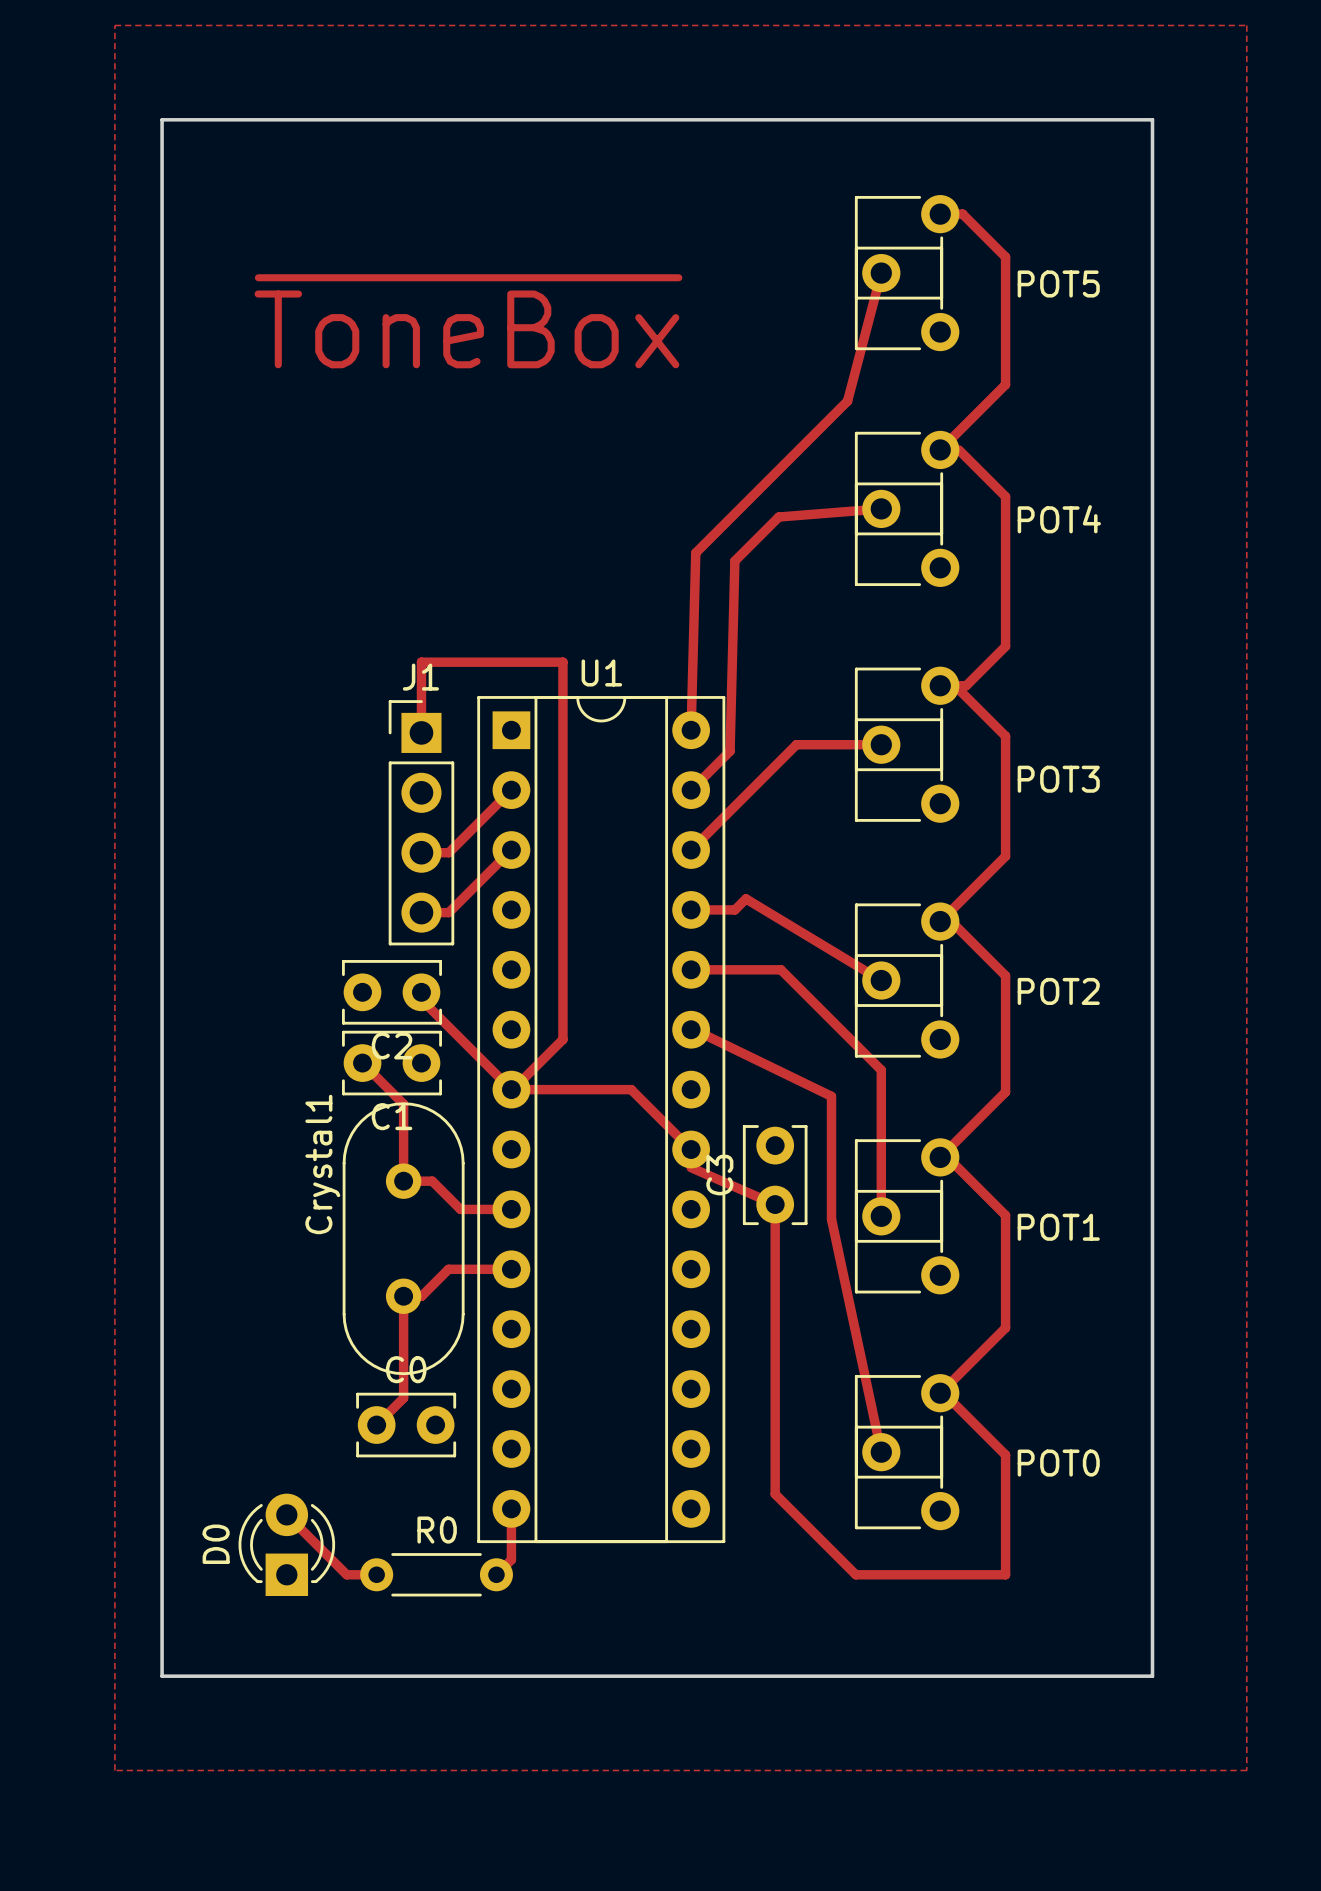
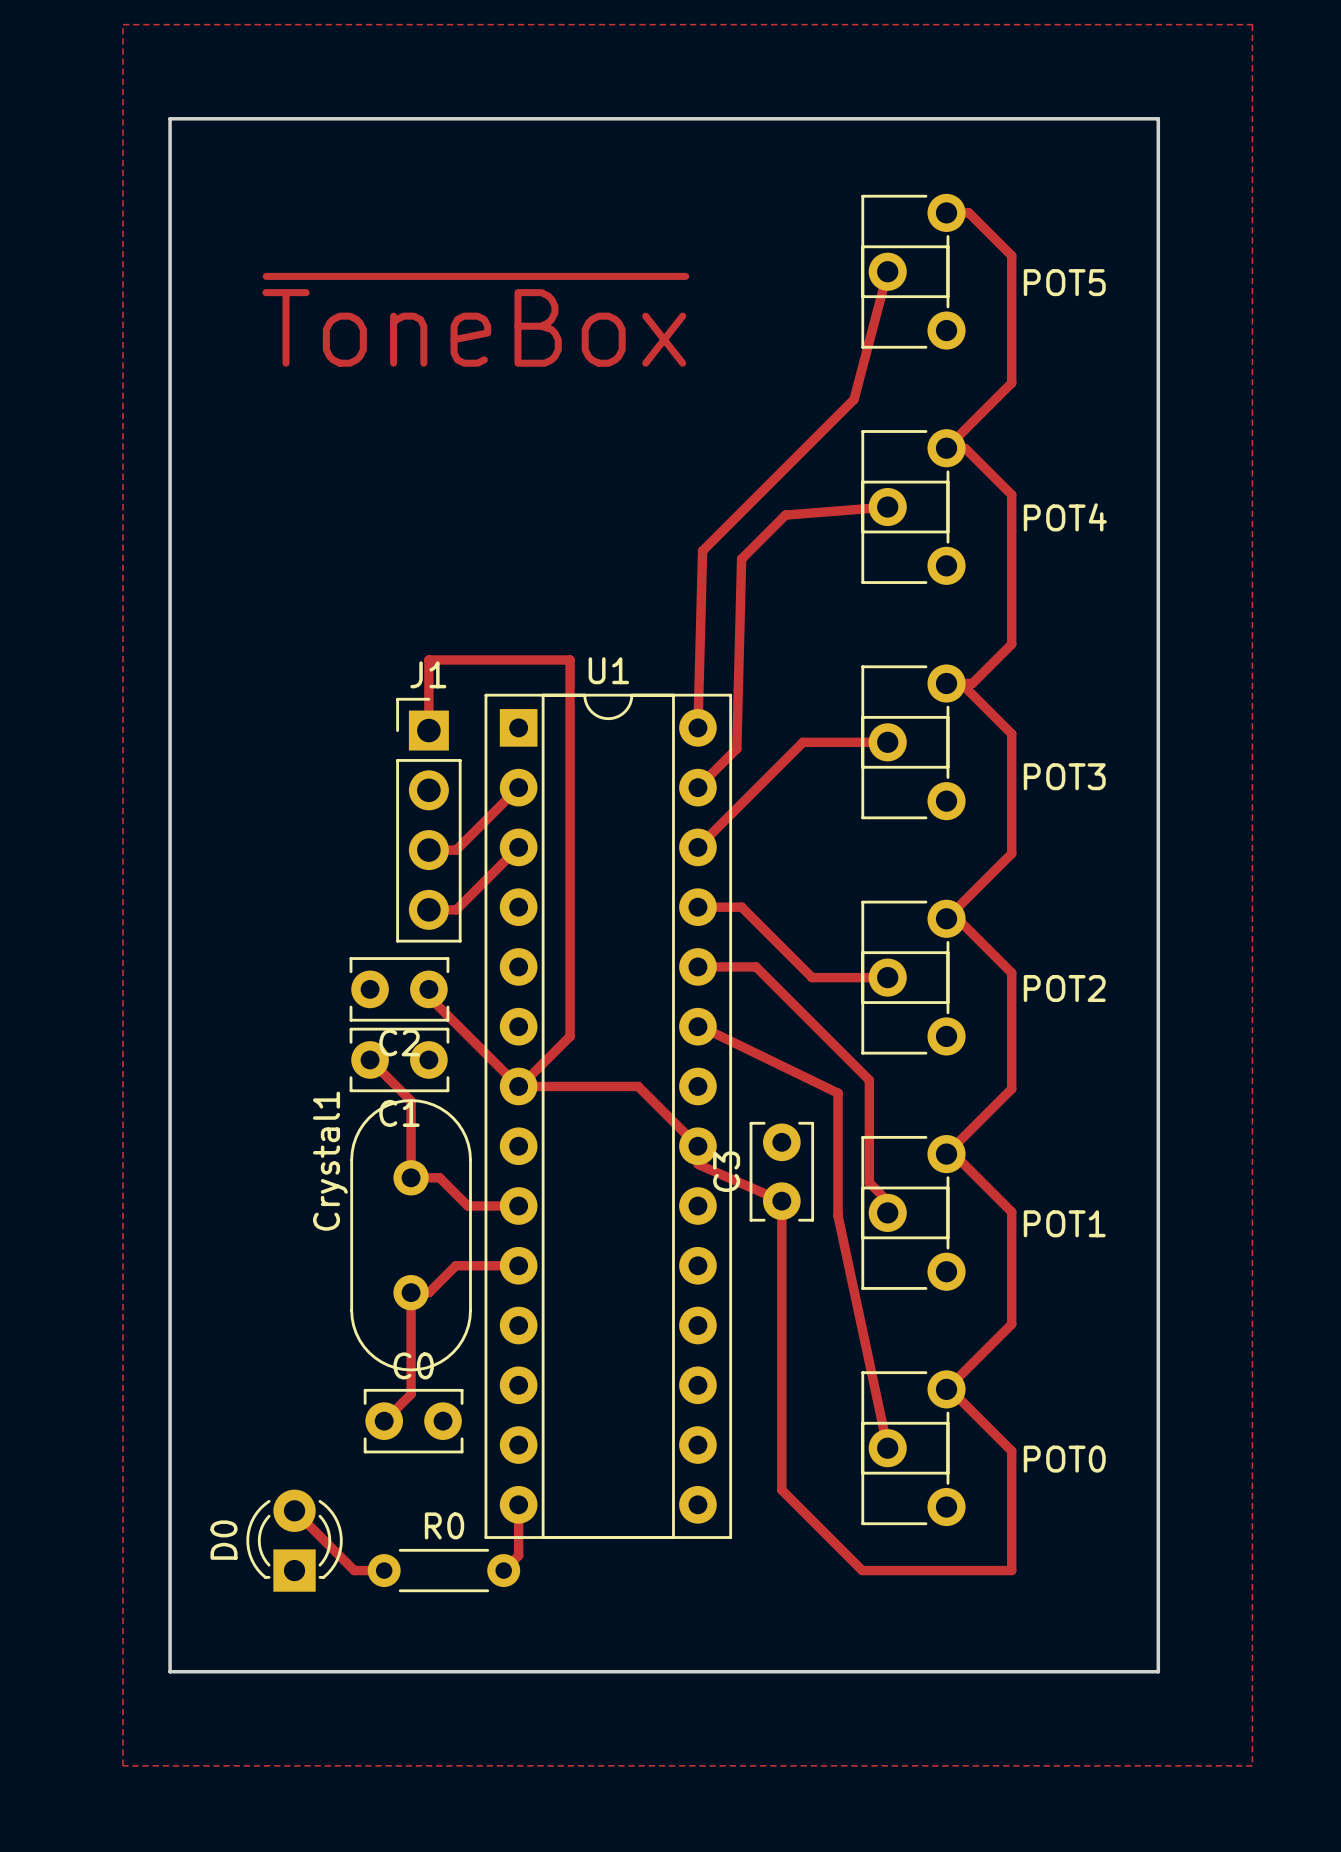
track: (734, 909) (745, 898) (881, 980) -> (741, 907) (812, 977) (887, 977)
track: (749, 969) (780, 969) (881, 1070) (881, 1204) -> (756, 966) (869, 1080) (869, 1182) (887, 1201)

